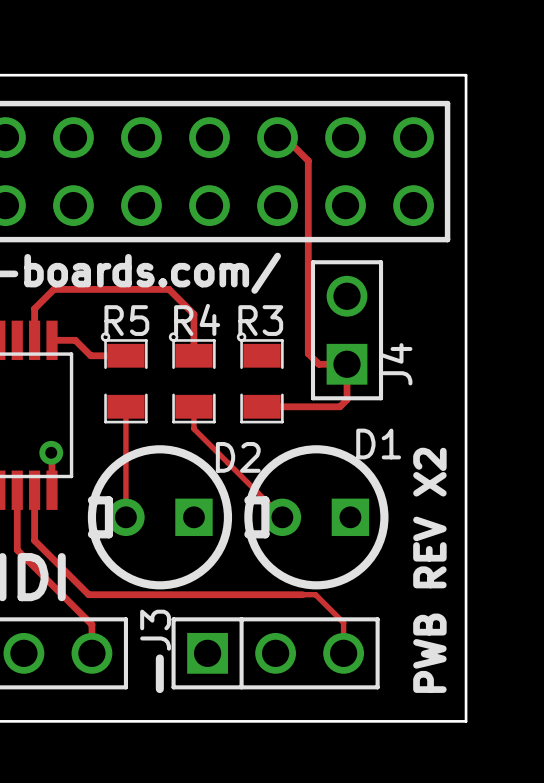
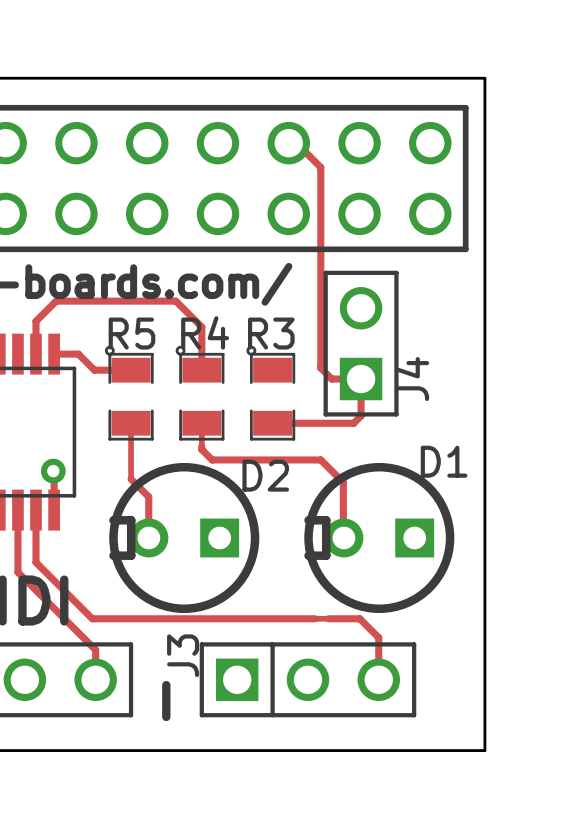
track: (193, 428) (282, 517) -> (201, 446) (201, 449) (212, 459) (320, 459) (343, 482) (343, 538)
track: (125, 460) (125, 517) -> (131, 479) (148, 496) (148, 538)
D2 position: (159, 517) -> (184, 537)
D1 position: (316, 517) -> (379, 537)
text: PWB REV X2 (429, 570) -> none
track: (315, 594) (343, 622) (343, 653) -> (328, 618) (359, 618) (378, 637) (378, 679)
J3 position: (275, 653) -> (307, 679)

